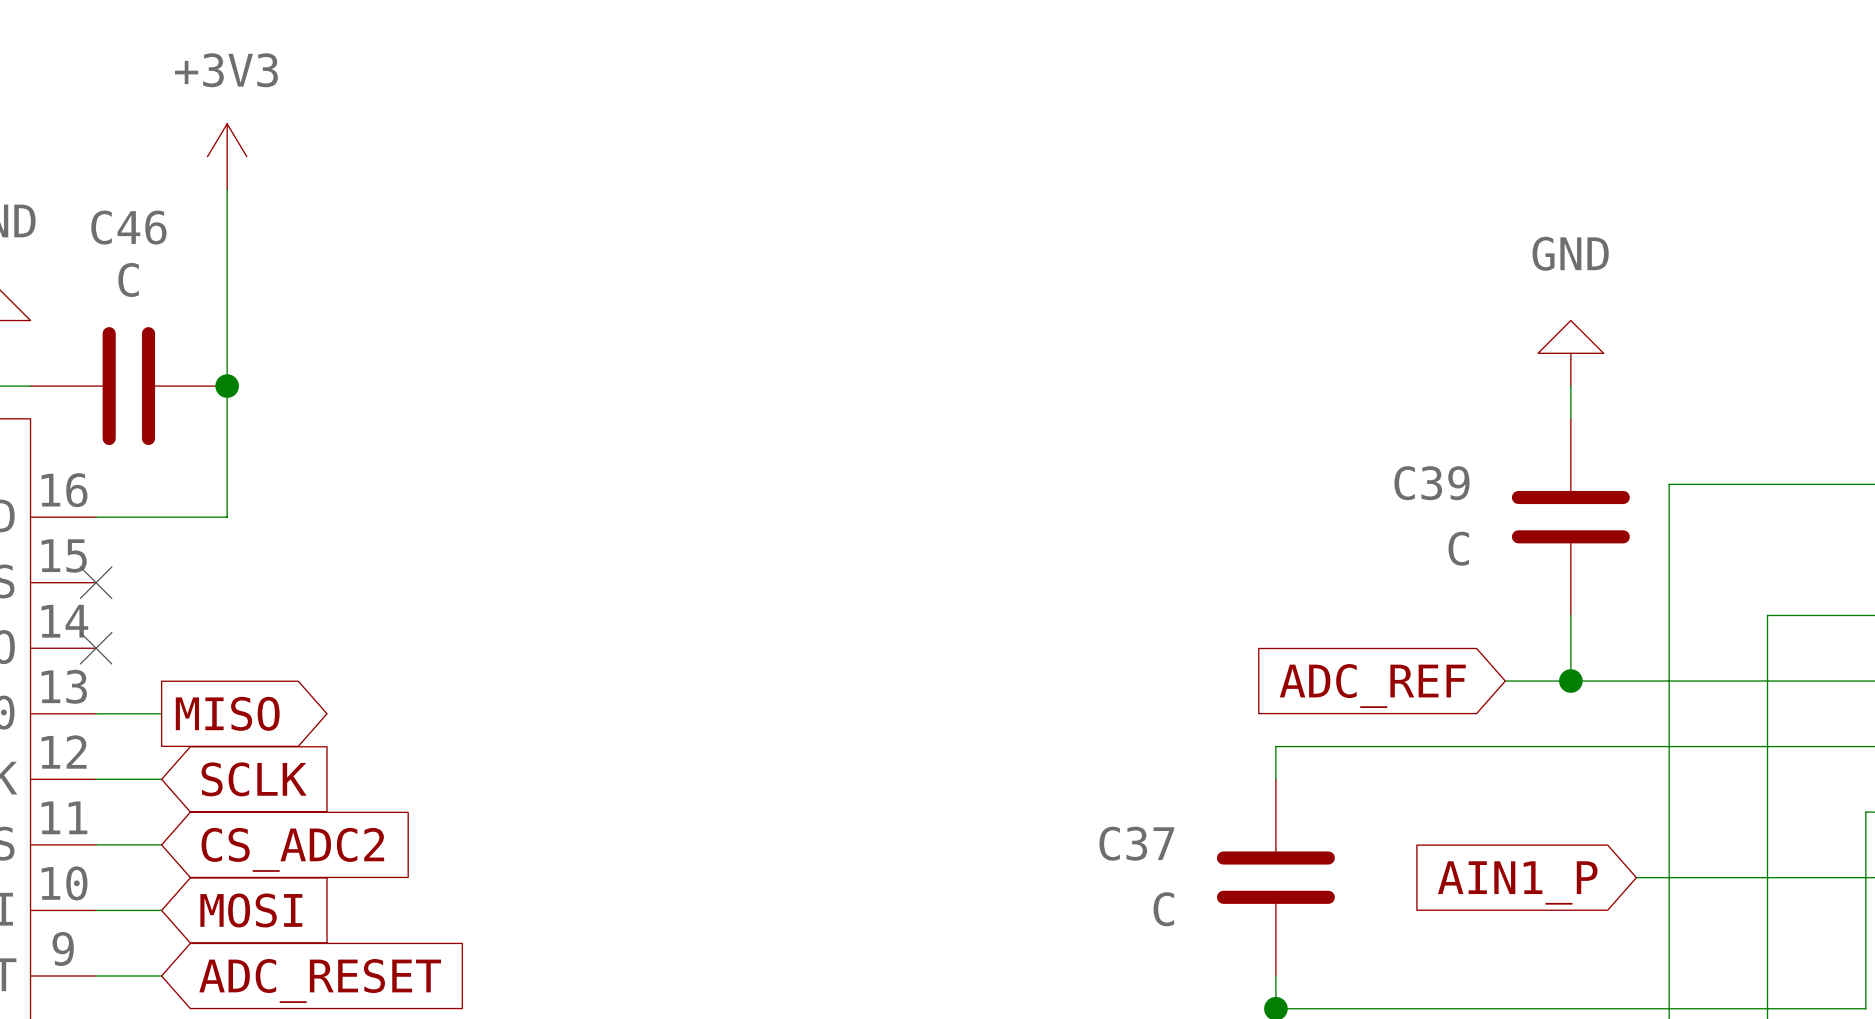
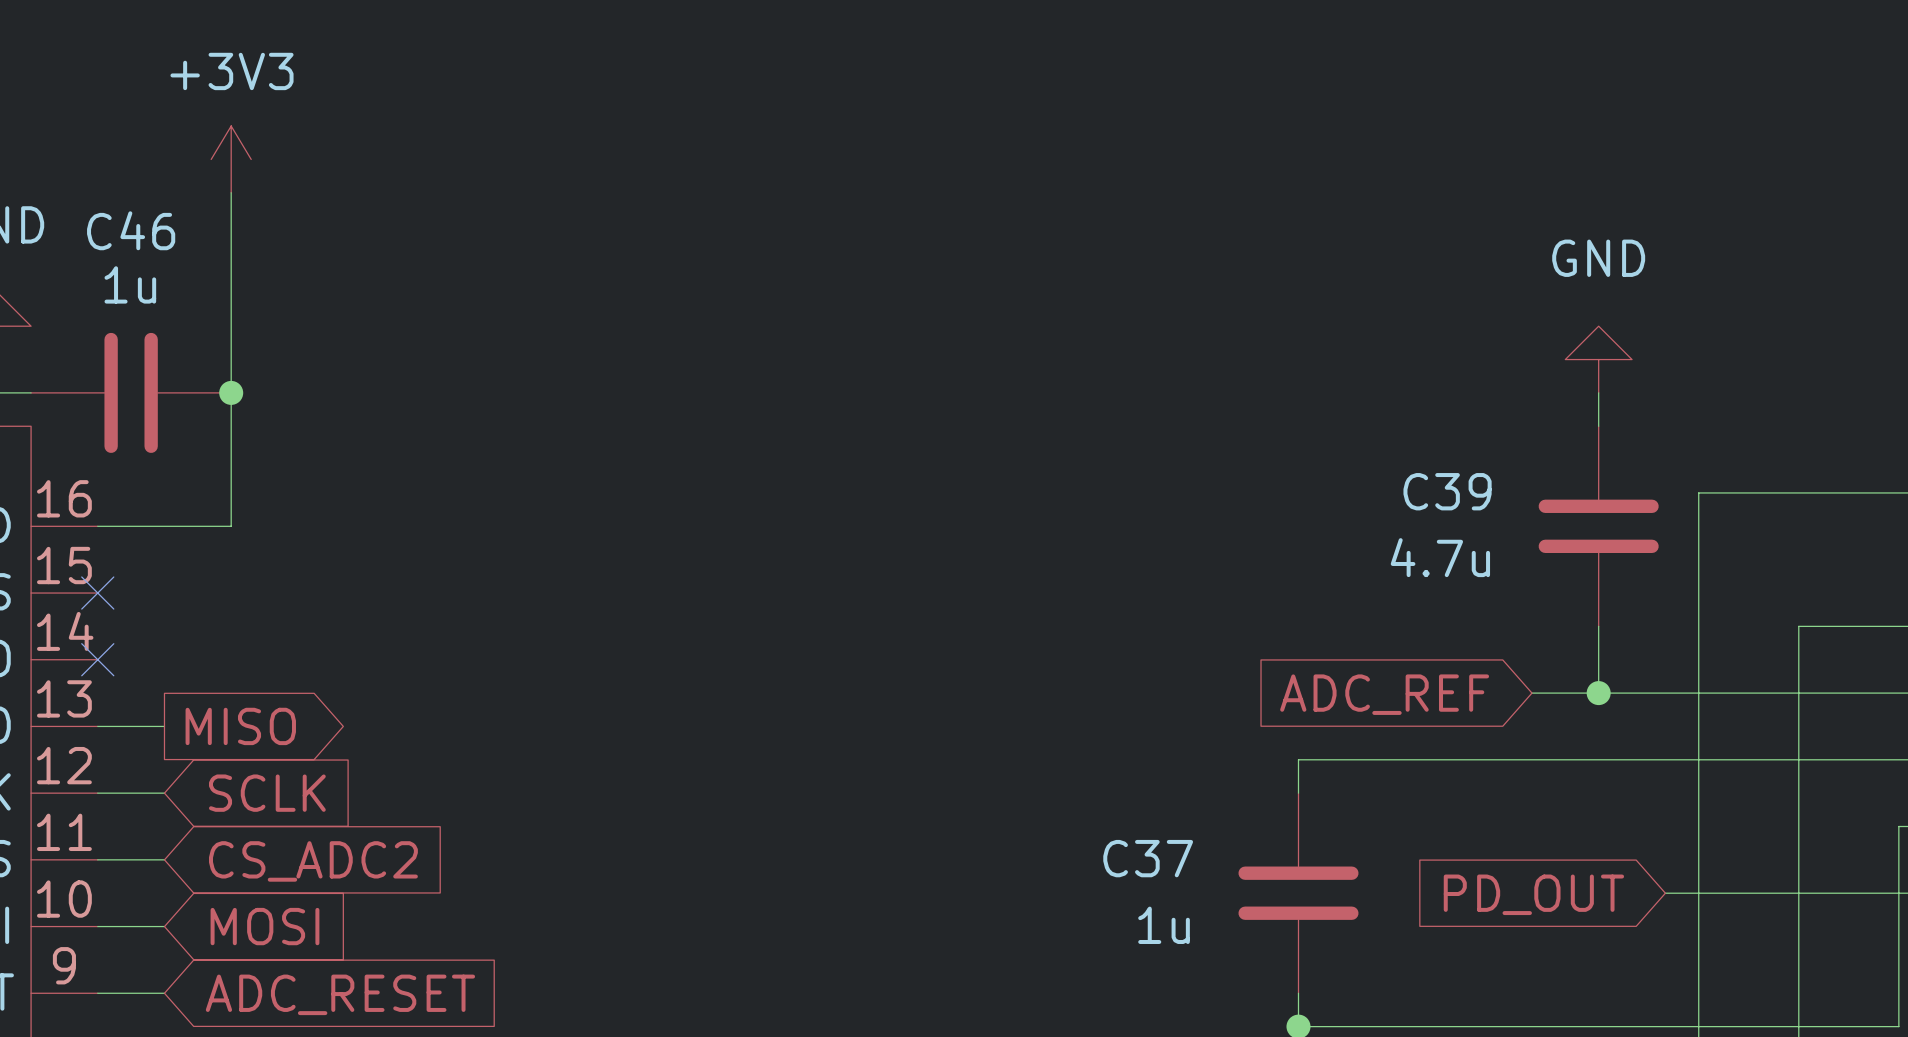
C46 value: C (128, 279) -> 1u (130, 284)
C39 value: C (1458, 548) -> 4.7u (1440, 557)
global label: AIN1_P (1517, 882) -> PD_OUT (1533, 894)
C37 value: C (1163, 909) -> 1u (1164, 925)

